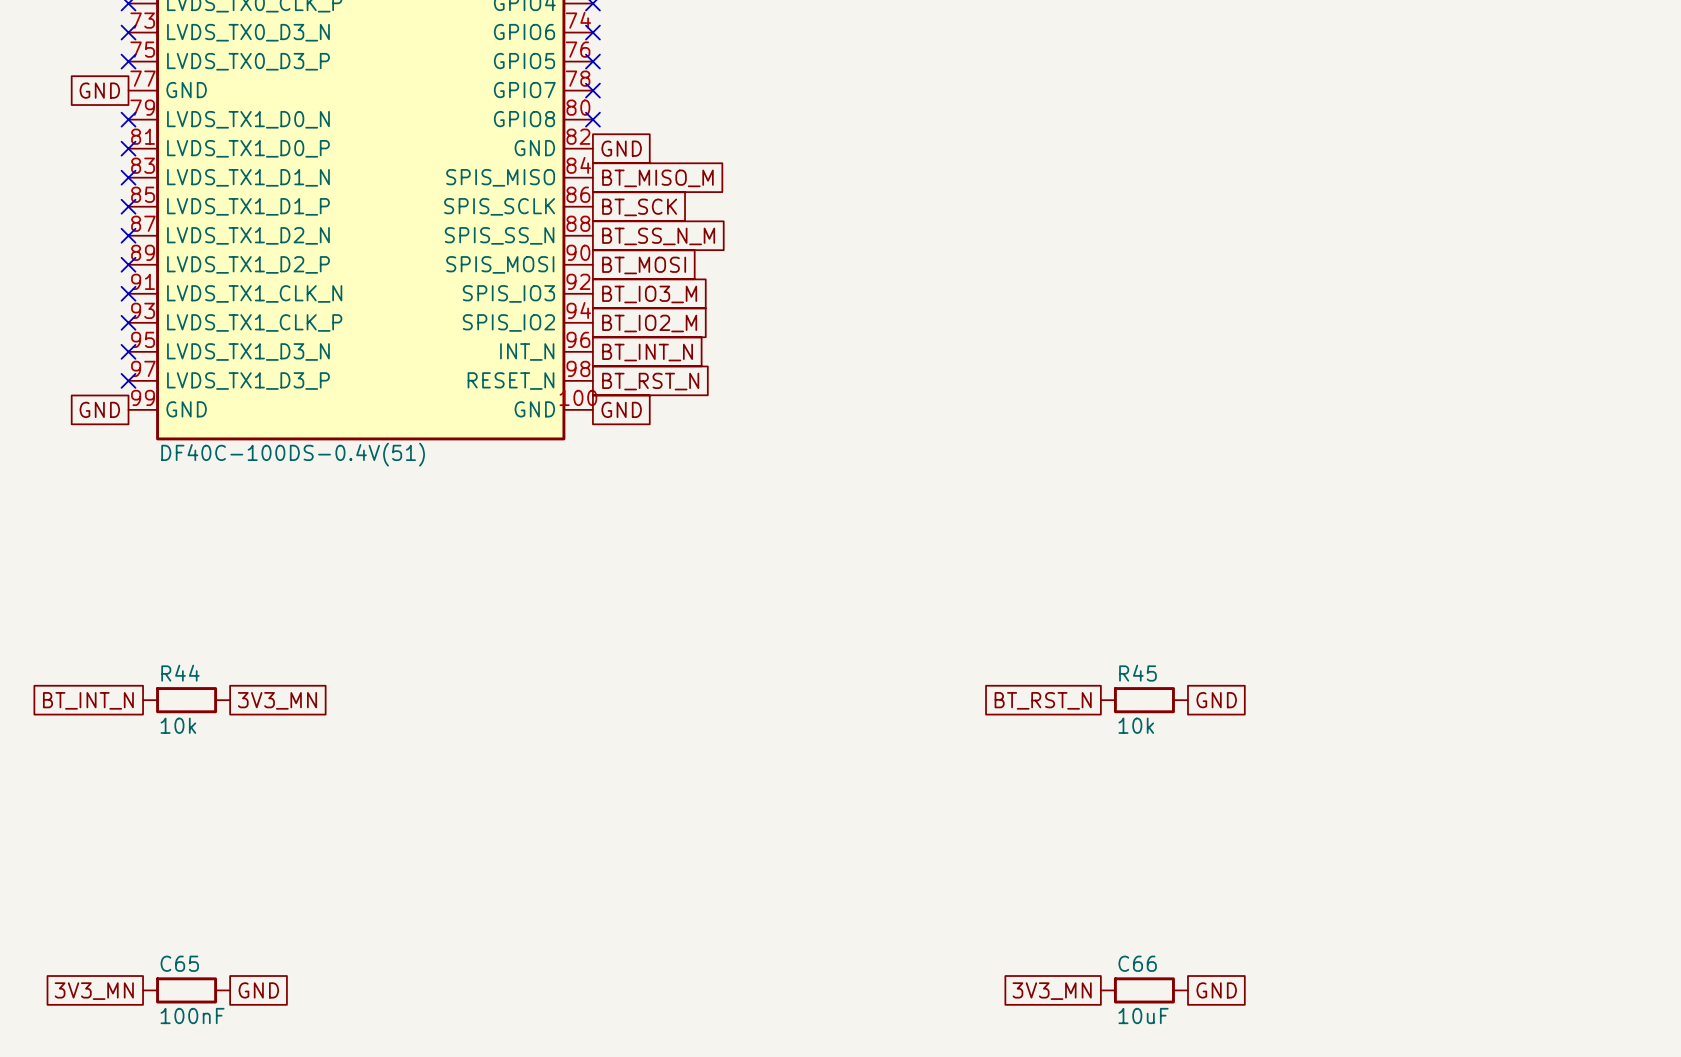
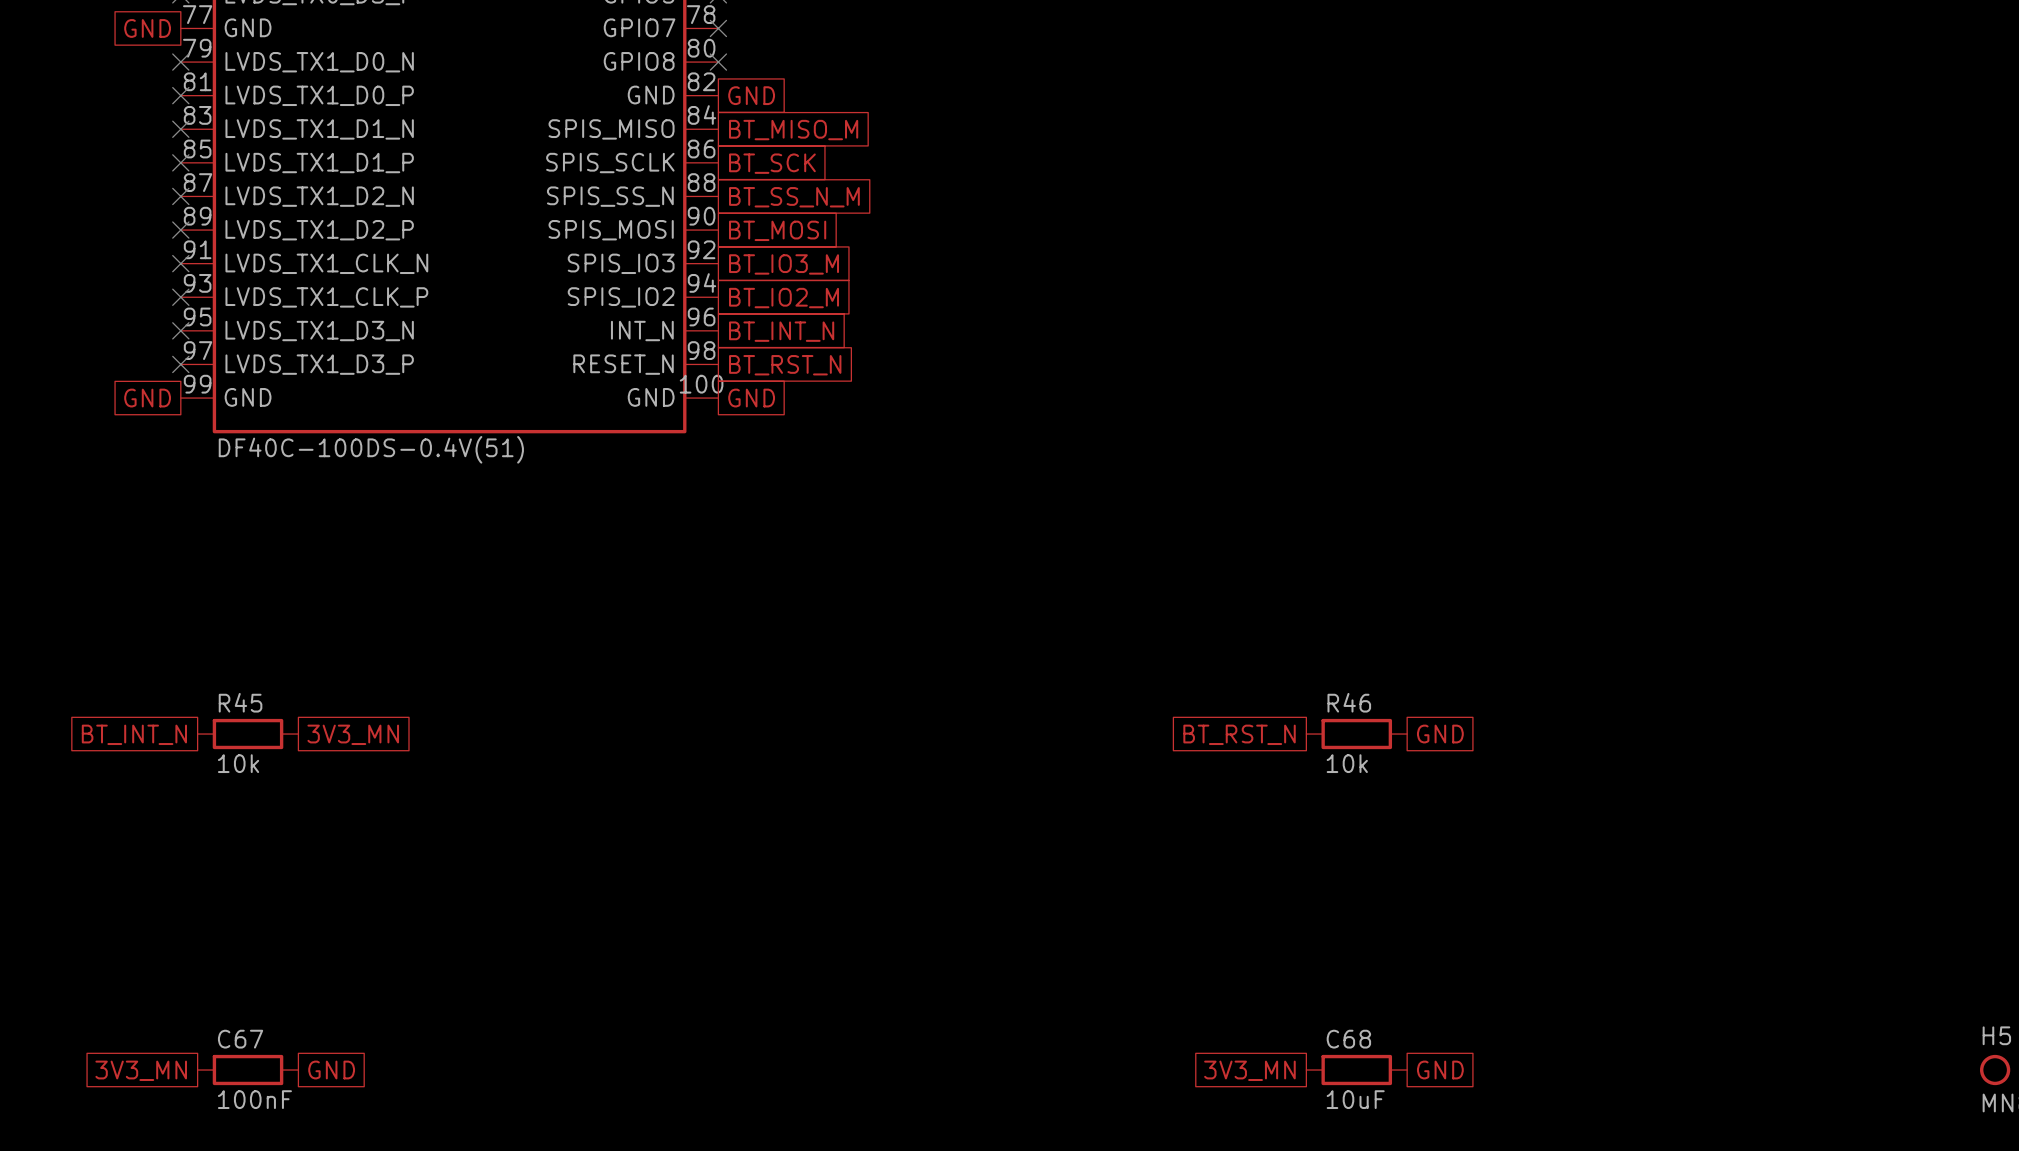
R44 name: R44 (180, 673) -> R45 (240, 702)
R45 name: R45 (1137, 673) -> R46 (1349, 702)
C65 name: C65 (179, 963) -> C67 (240, 1039)
C66 name: C66 (1137, 963) -> C68 (1348, 1039)

